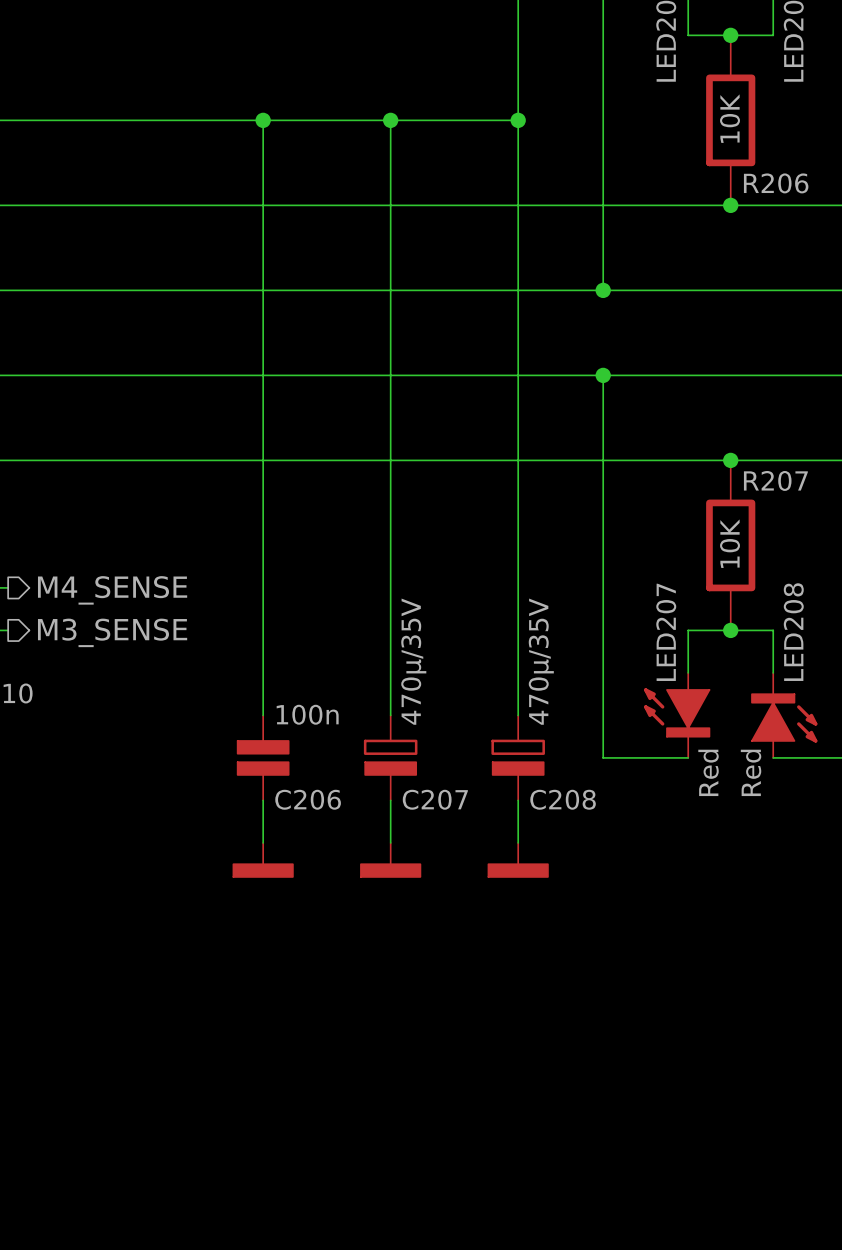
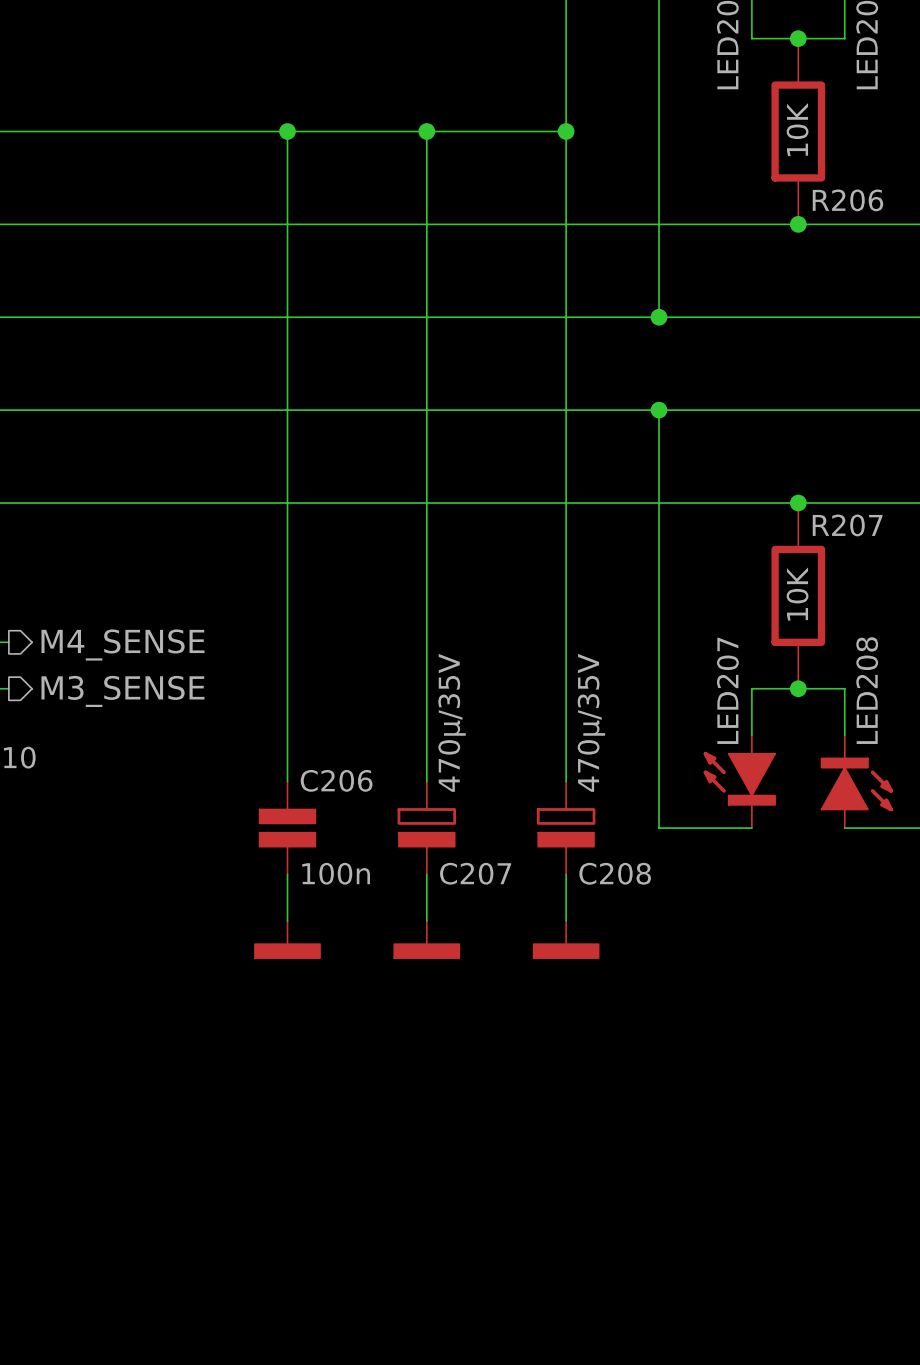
C206 value position: 100n (307, 714) -> 100n (336, 873)
LED207 text: Red (708, 772) -> none
LED208 text: Red (751, 772) -> none
C206 name position: C206 (308, 799) -> C206 (336, 780)

